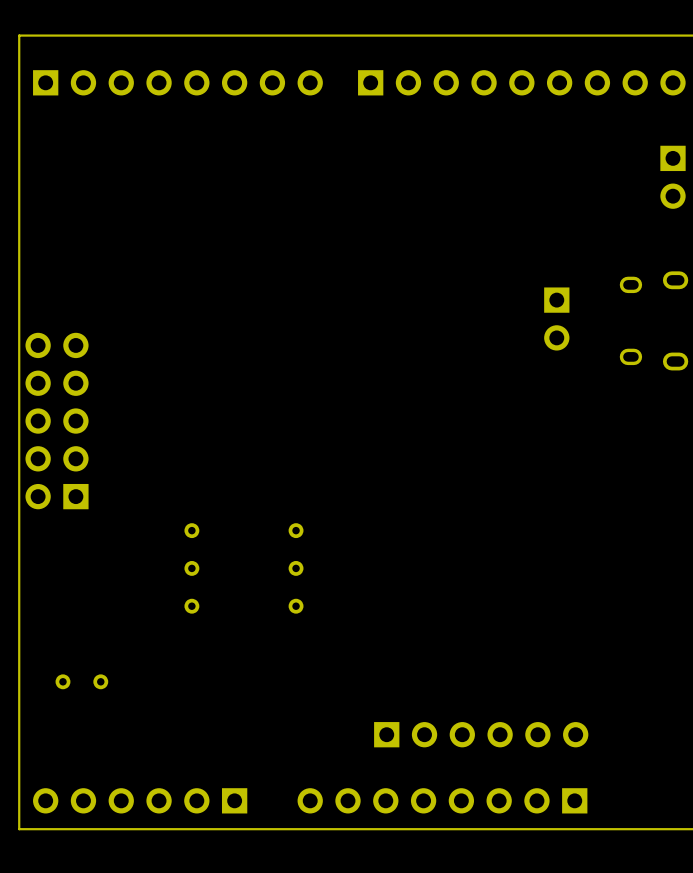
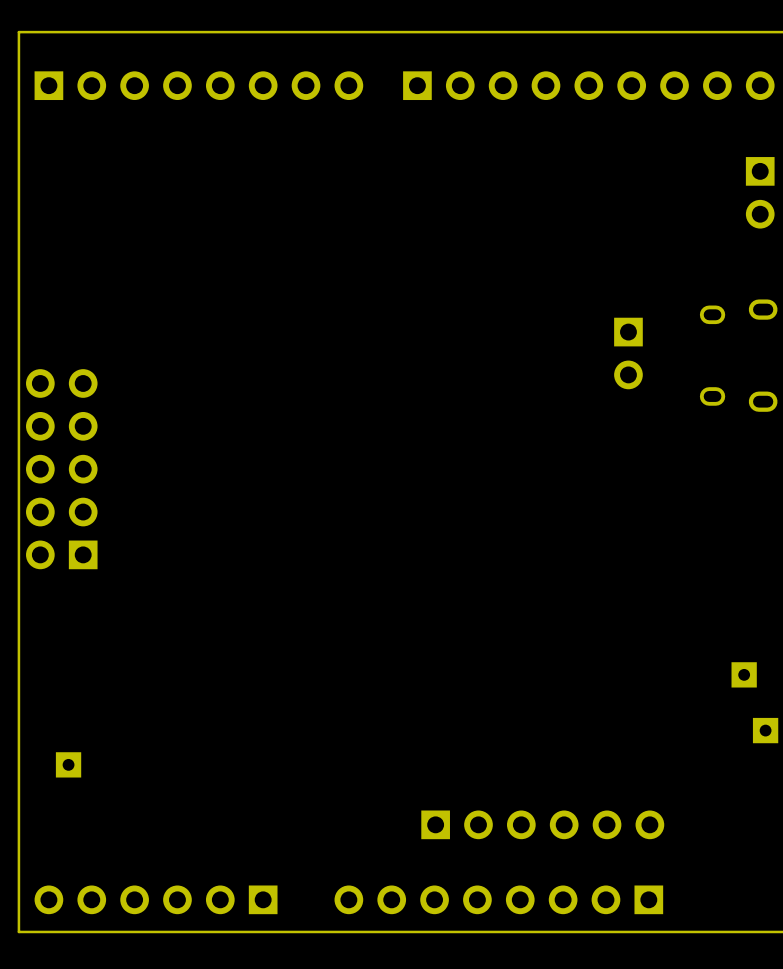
part: (191, 530) -> none
part: (296, 530) -> none
part: (191, 568) -> none
part: (296, 568) -> none
part: none -> (744, 674)
part: (191, 606) -> none
part: (296, 606) -> none
part: none -> (765, 730)
part footprint: [55, 674, 71, 690] -> [55, 752, 82, 778]
part: (100, 681) -> none

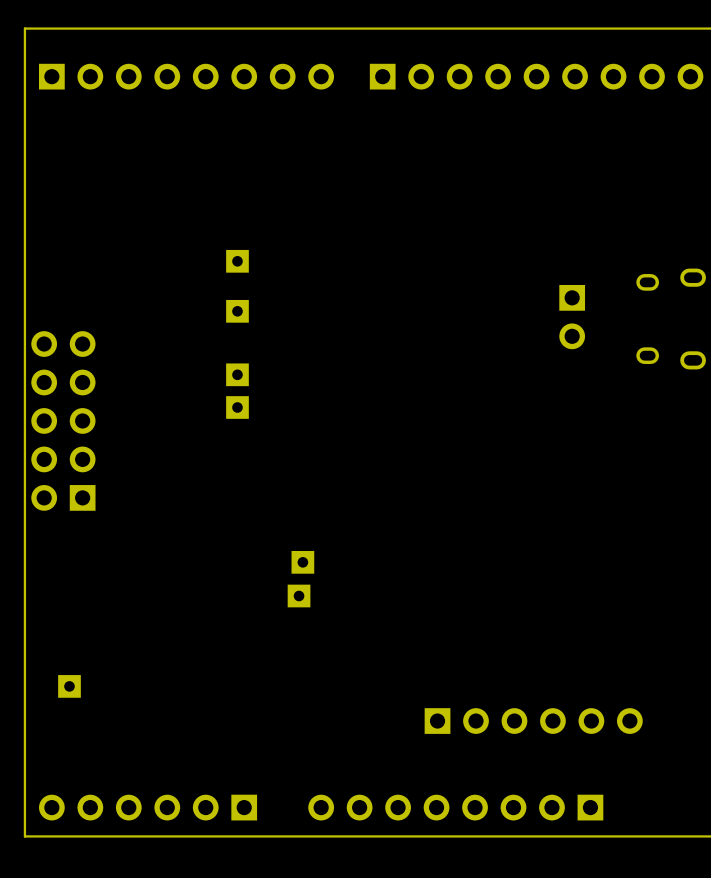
part: (760, 192) -> none
part: none -> (237, 261)
part: none -> (237, 311)
part: none -> (237, 374)
part: none -> (237, 407)
part: none -> (302, 562)
part: none -> (299, 596)
part: (744, 674) -> none
part: (765, 730) -> none
part position: (542, 824) -> (533, 721)

